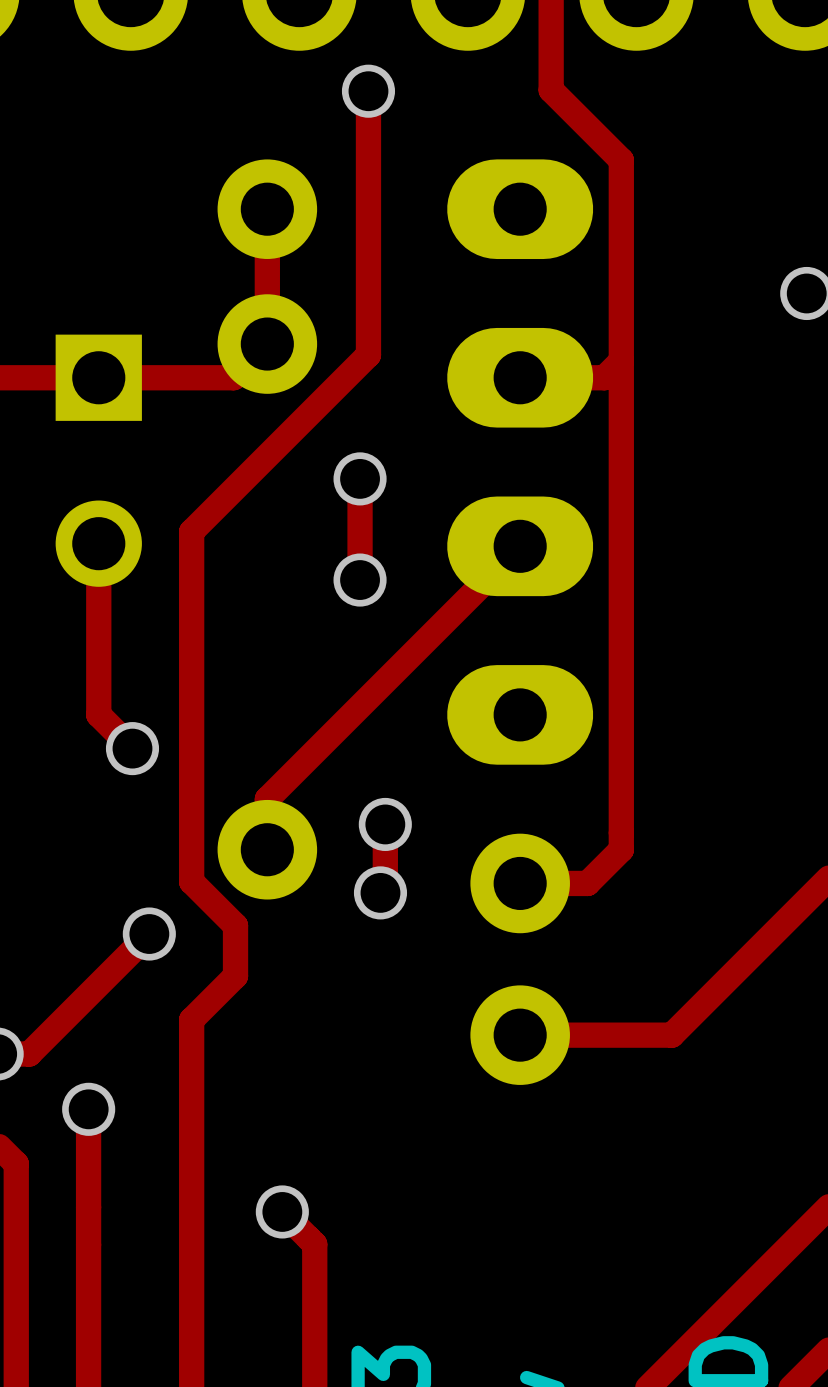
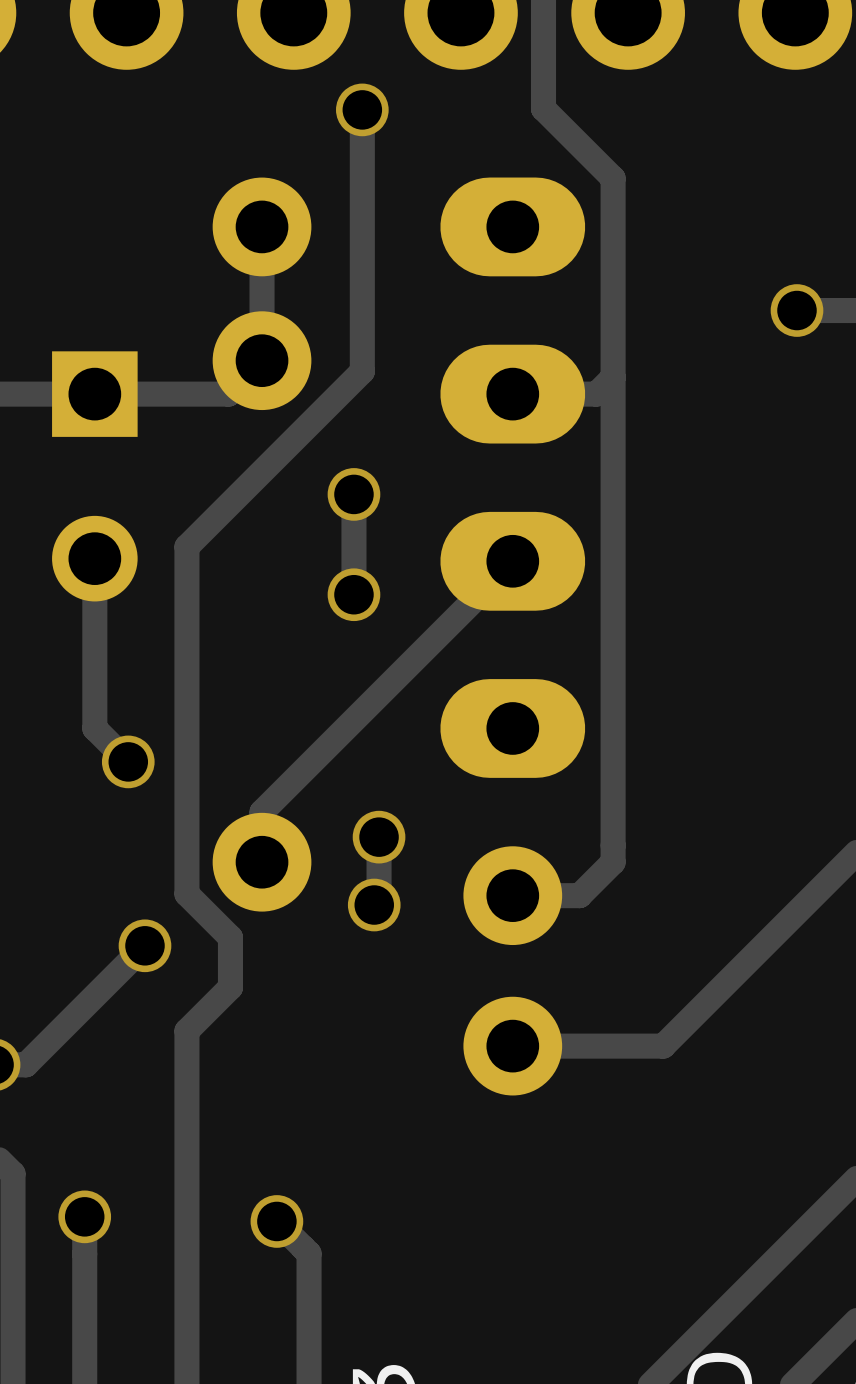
track: (88, 1109) (88, 1207) -> none
via position: (88, 1109) -> (84, 1216)

